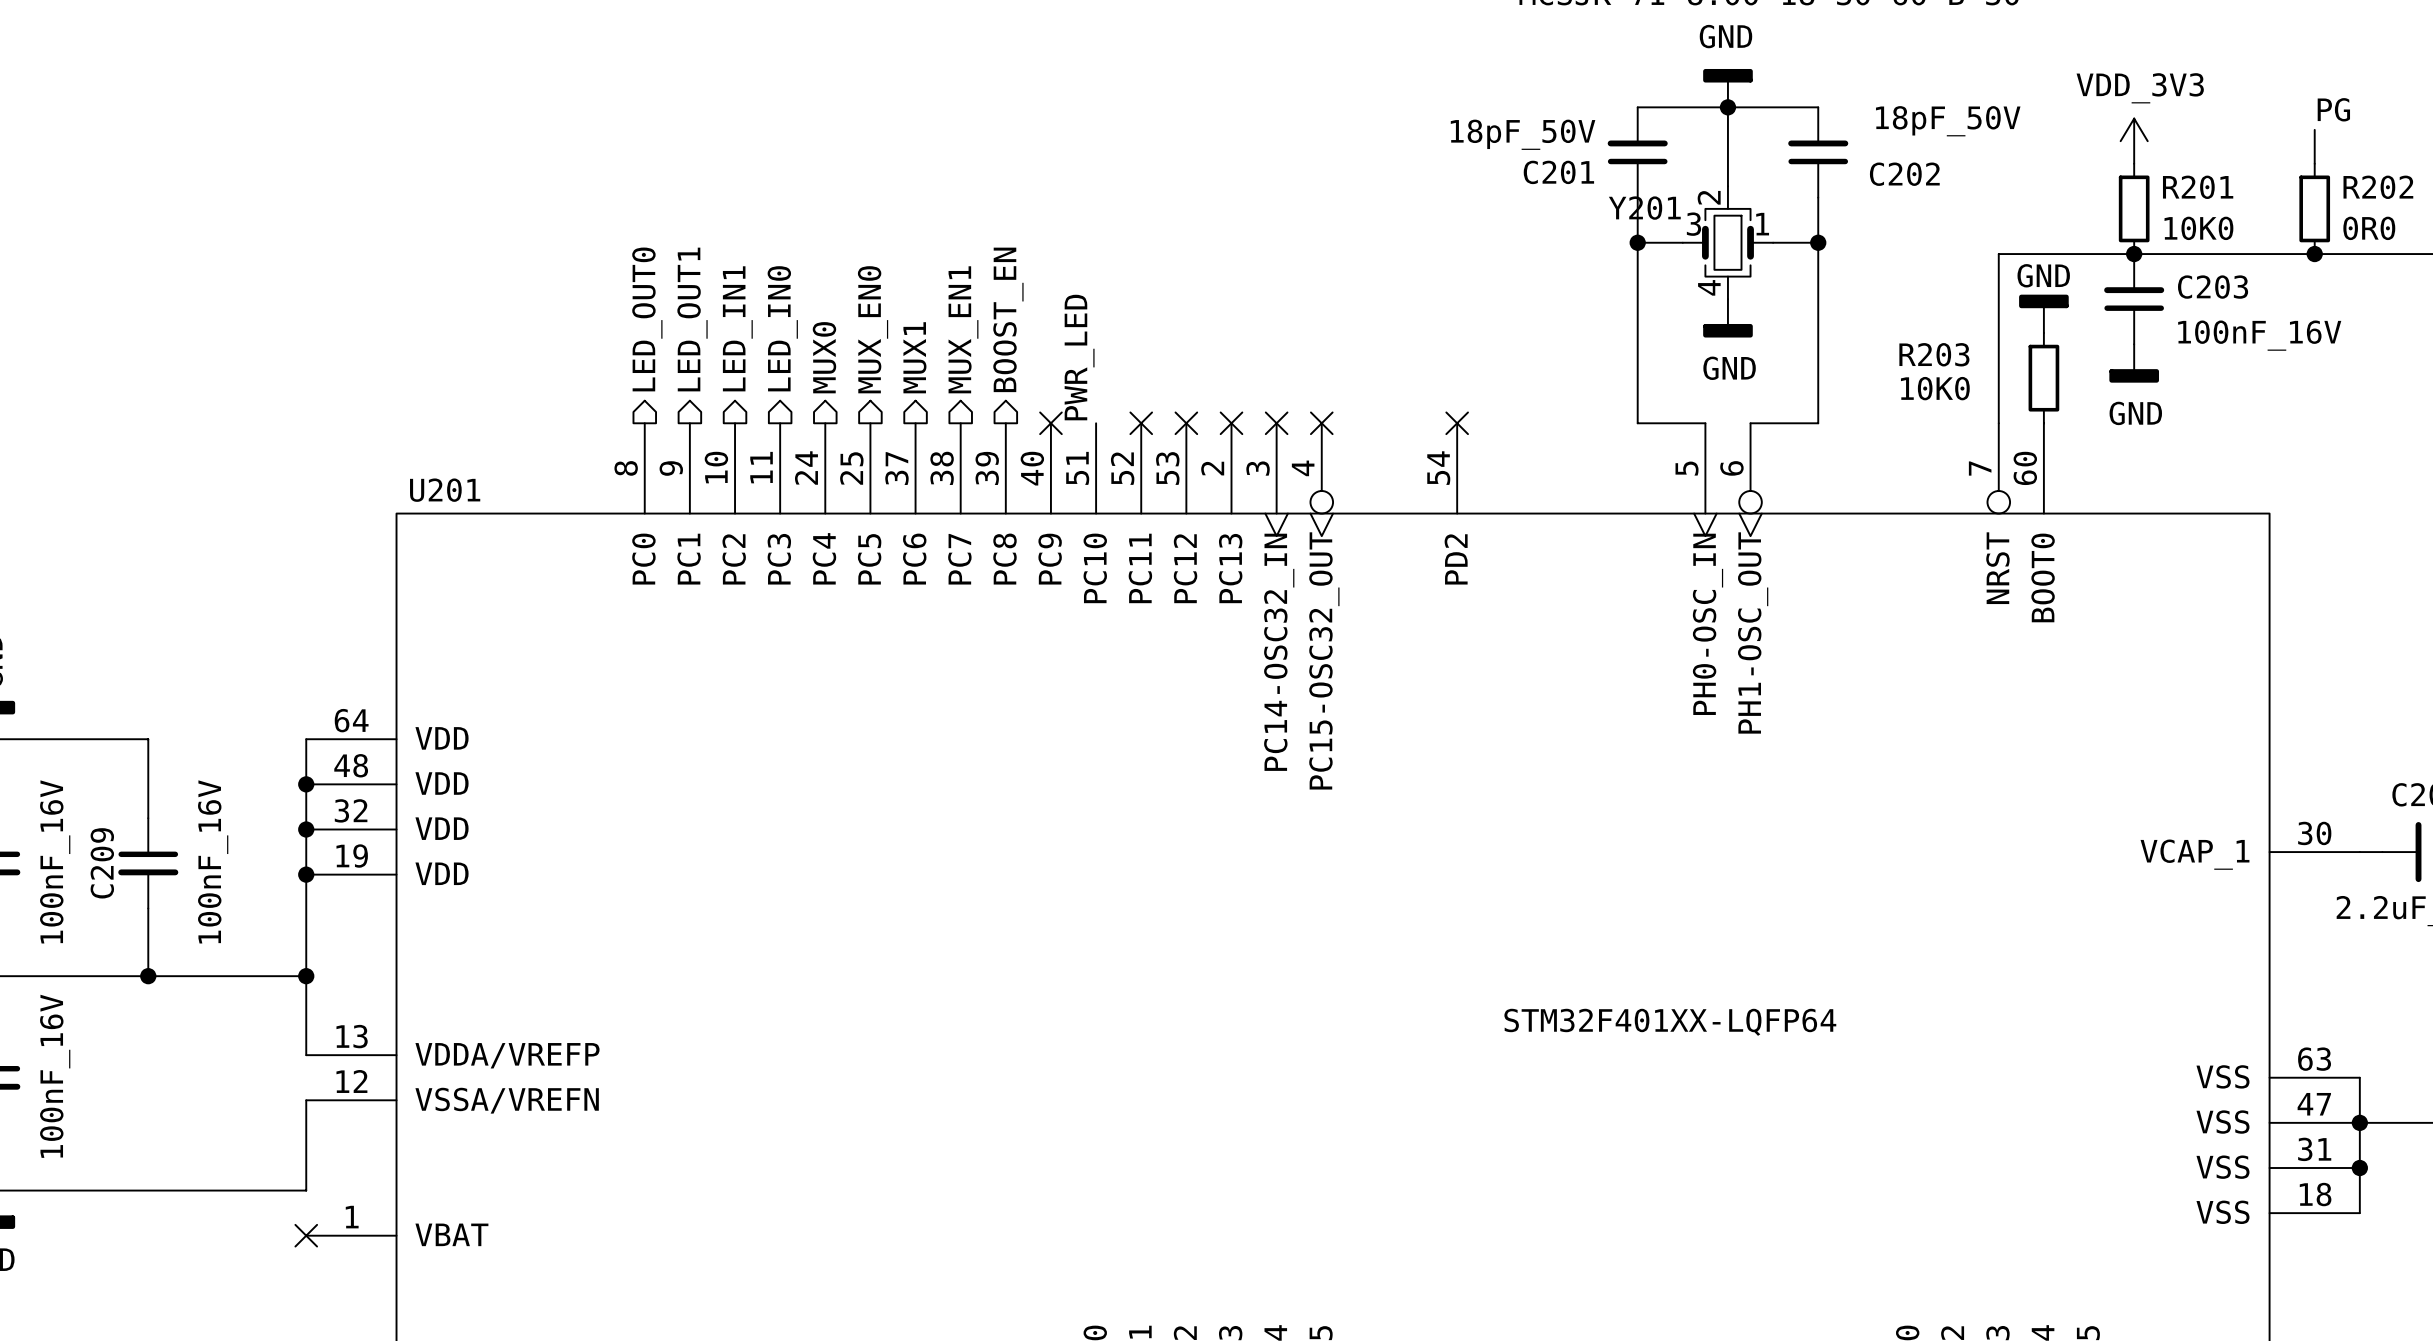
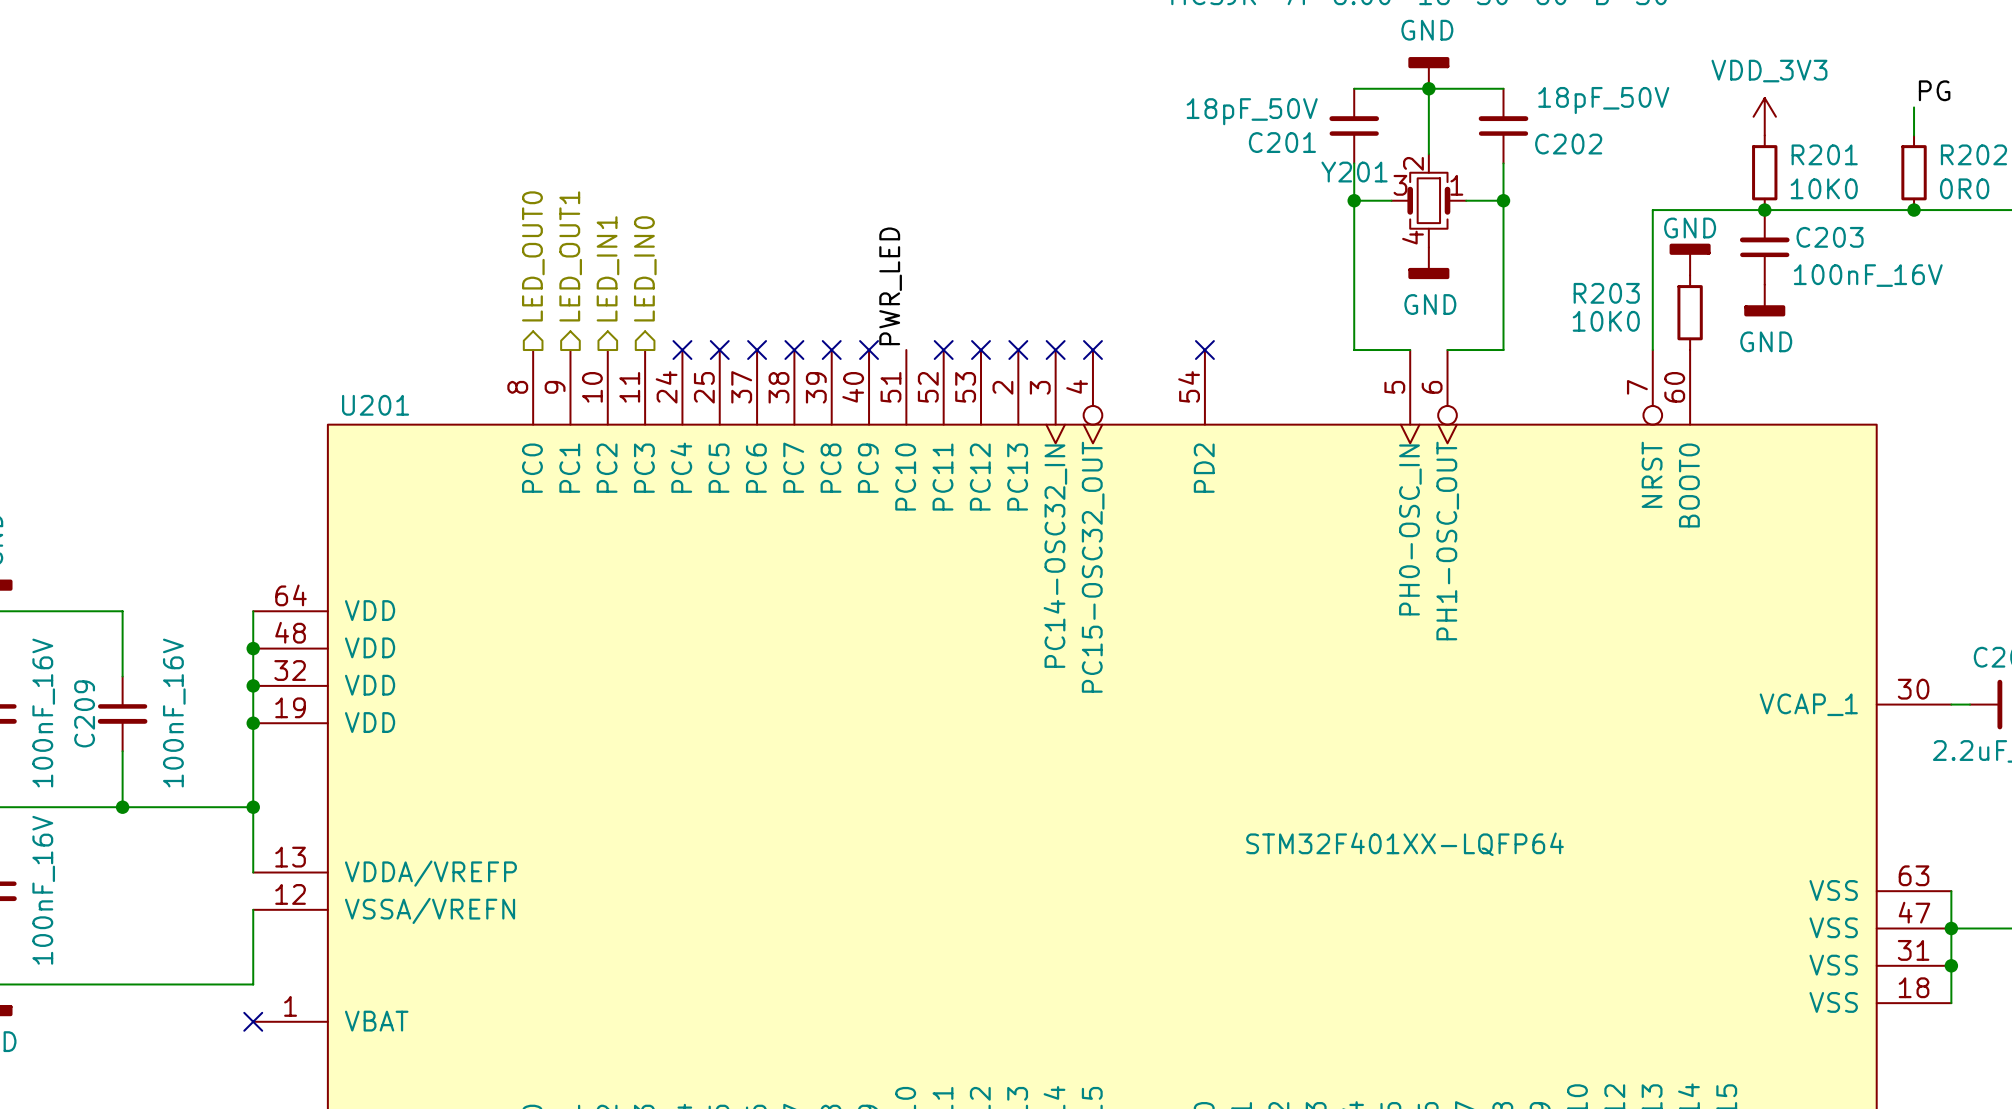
hierarchical label: BOOST_EN (1008, 319) -> none
hierarchical label: MUX_EN0 (873, 329) -> none
hierarchical label: MUX_EN1 (963, 329) -> none
hierarchical label: MUX0 (824, 357) -> none
hierarchical label: MUX1 (914, 357) -> none
no-connect mark: none -> (682, 350)
no-connect mark: none -> (719, 350)
no-connect mark: none -> (757, 350)
no-connect mark: none -> (794, 350)
no-connect mark: none -> (831, 350)

